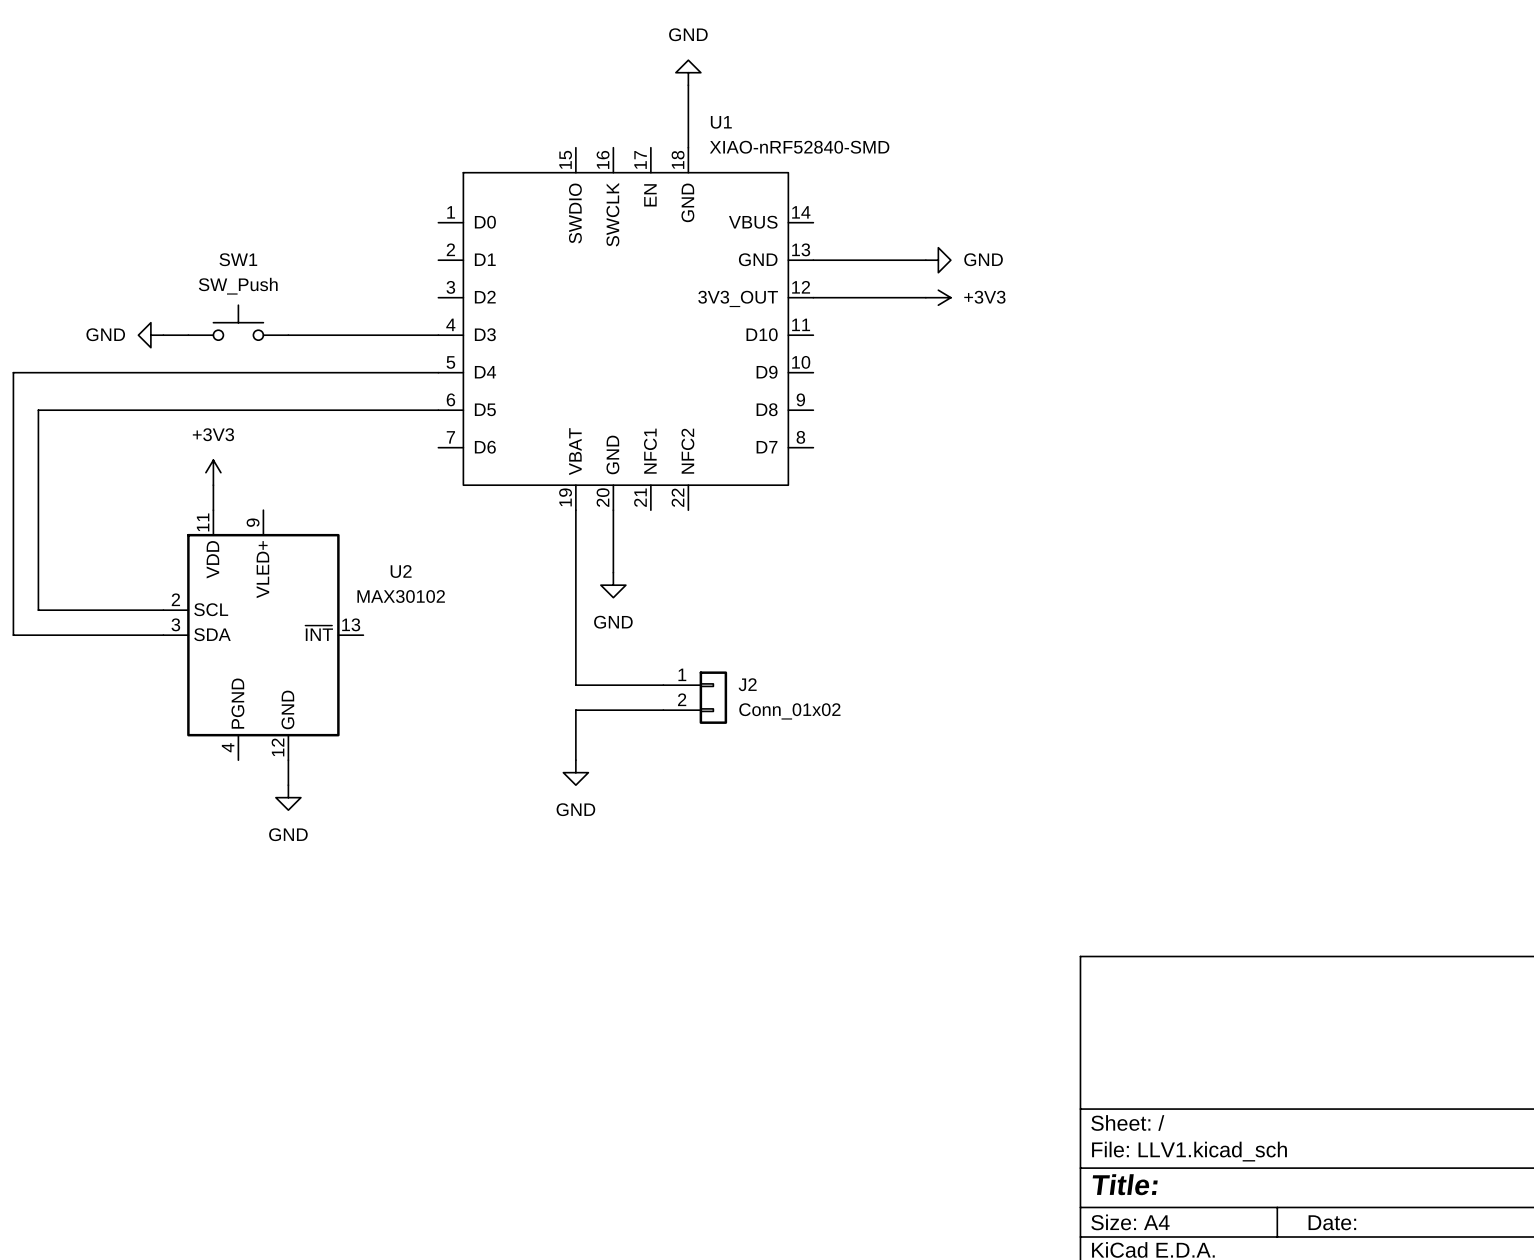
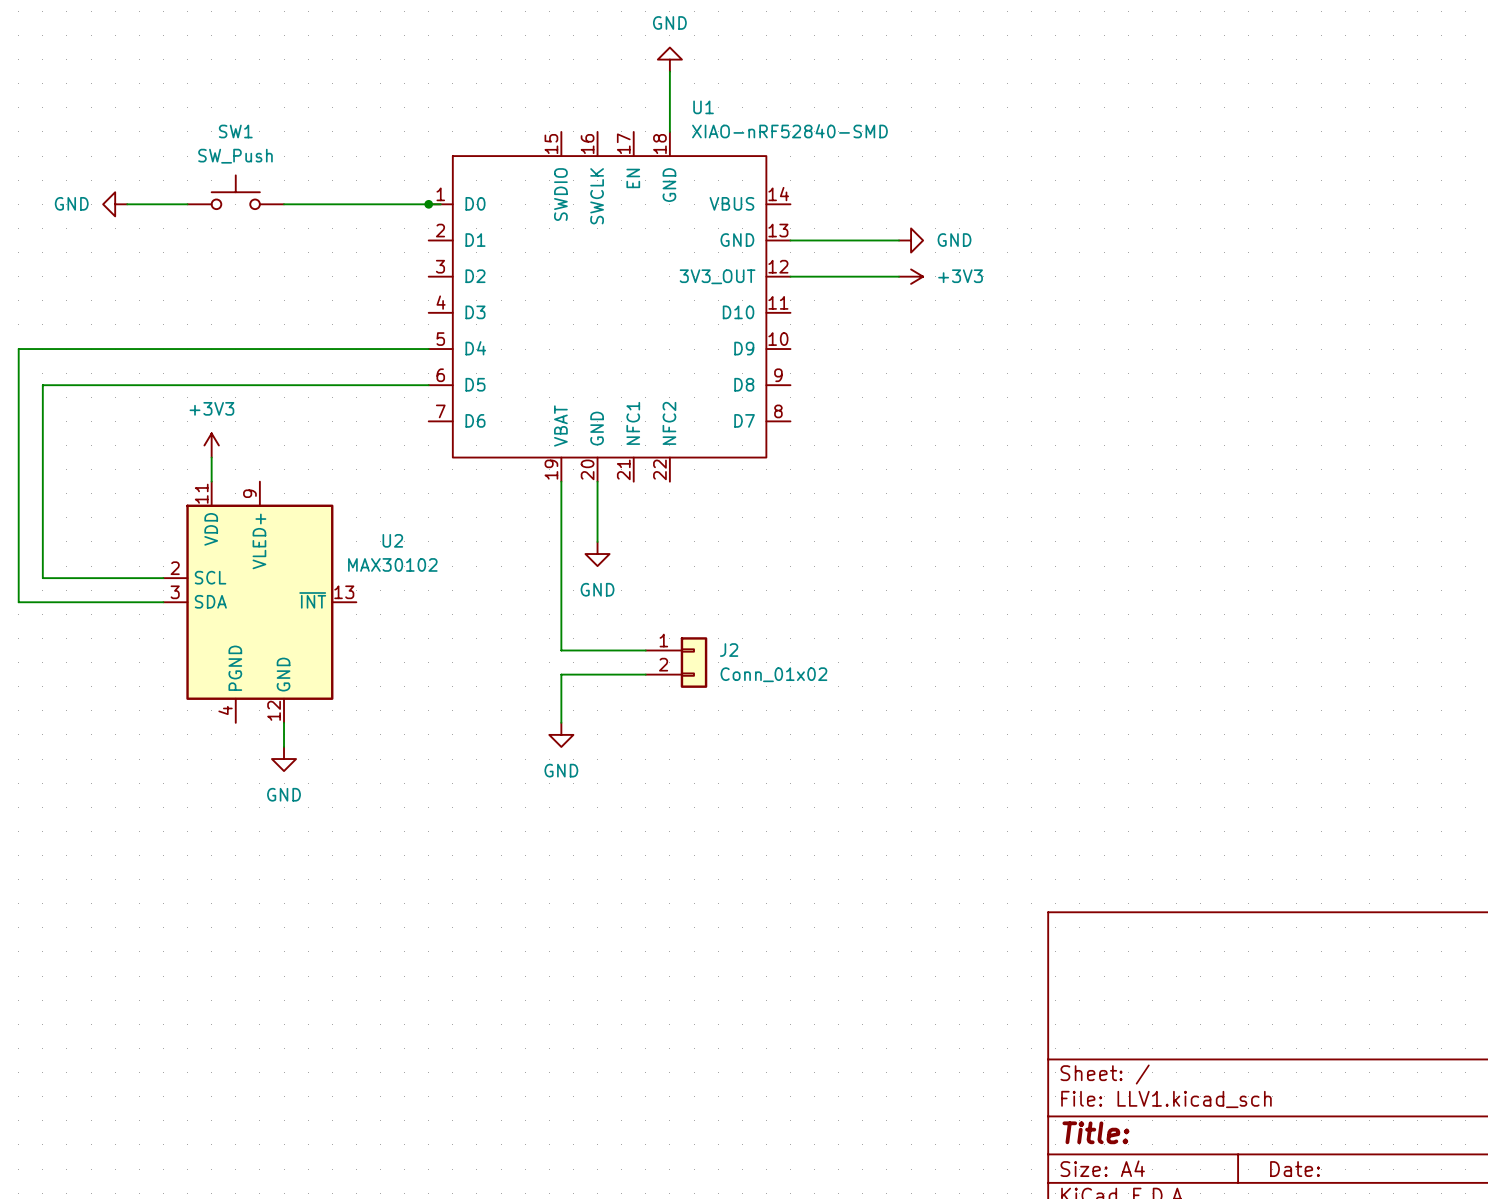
wire: none -> (127, 204) (187, 204)
wire: none -> (284, 204) (440, 204)
junction: none -> (428, 204)
SW1 position: (238, 322) -> (235, 192)
power symbol position: GND (150, 335) -> GND (115, 204)
wire: (163, 335) (188, 335) -> none
wire: (288, 335) (438, 335) -> none

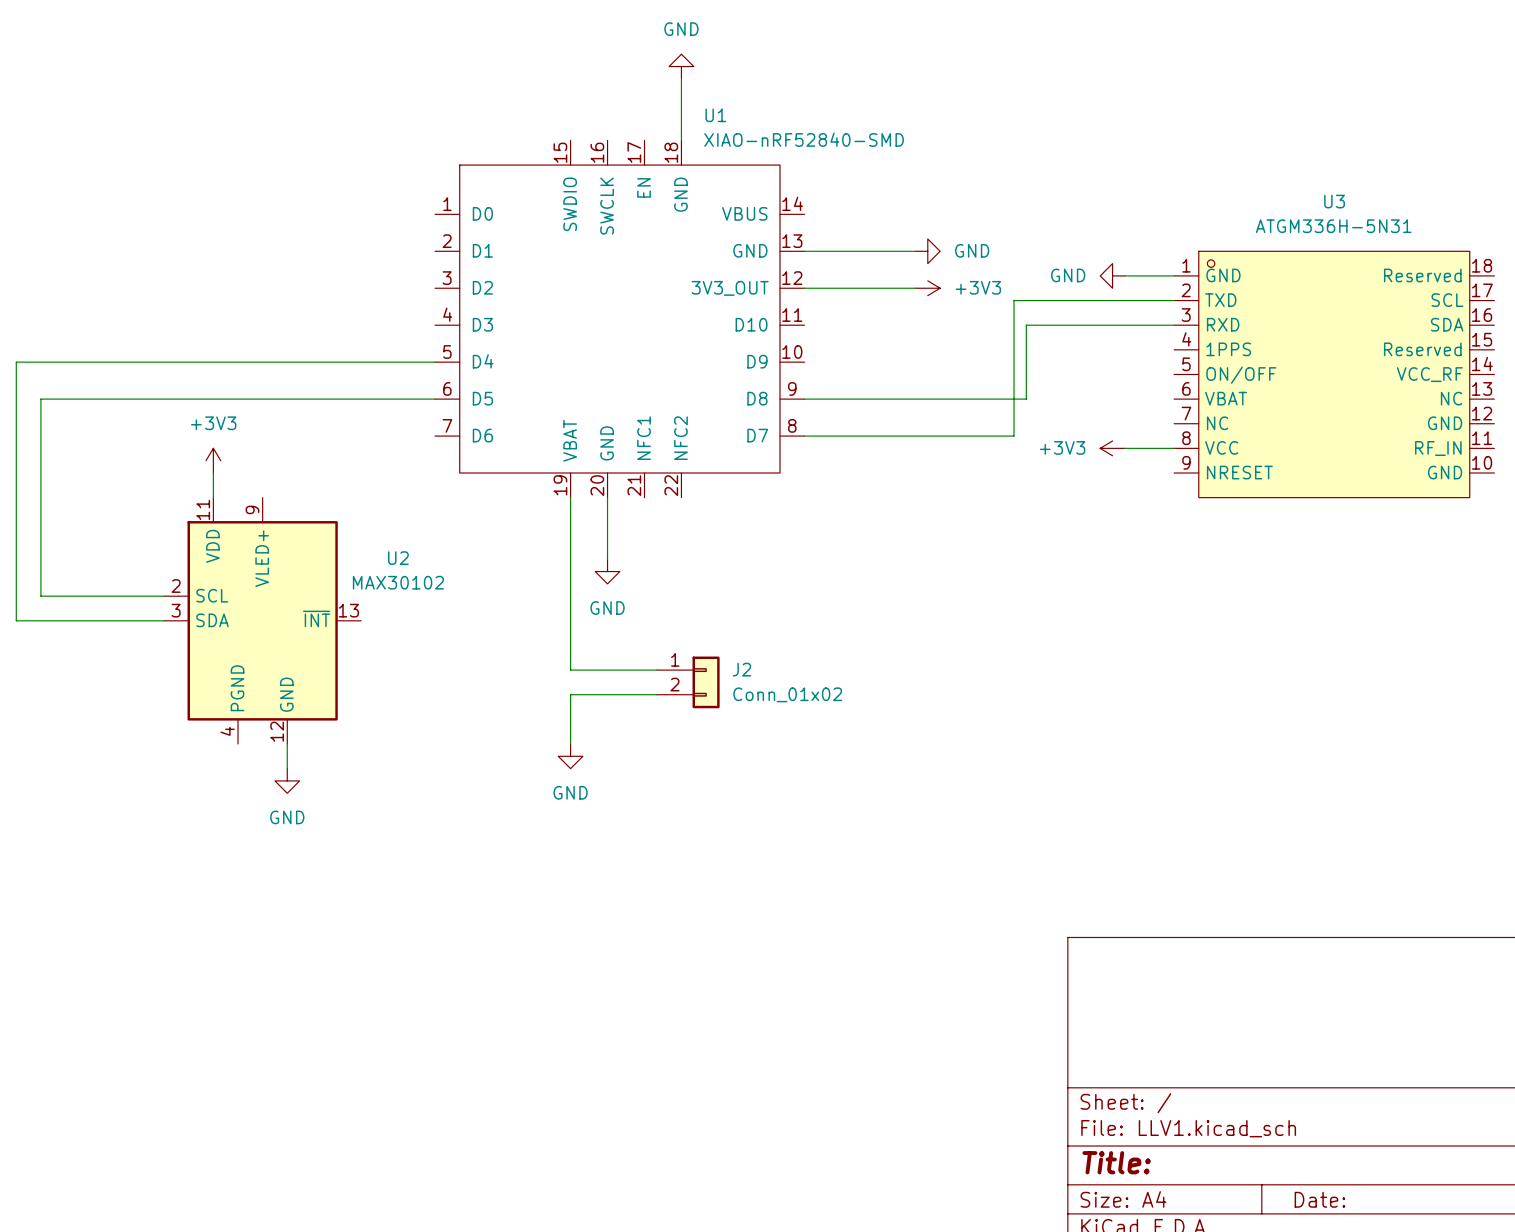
SW1: SW_Push (235, 192) -> none
power symbol: GND (115, 204) -> none
wire: (127, 204) (187, 204) -> none
wire: (284, 204) (440, 204) -> none
junction: (428, 204) -> none
power symbol: none -> GND (1112, 275)
wire: none -> (1124, 275) (1174, 275)
wire: none -> (1174, 300) (1014, 300) (1014, 436) (804, 436)
wire: none -> (1174, 325) (1026, 325) (1026, 399) (804, 399)
U3: none -> ATGM336H-5N31 (1334, 374)
power symbol: none -> +3V3 (1112, 448)
wire: none -> (1124, 448) (1174, 448)

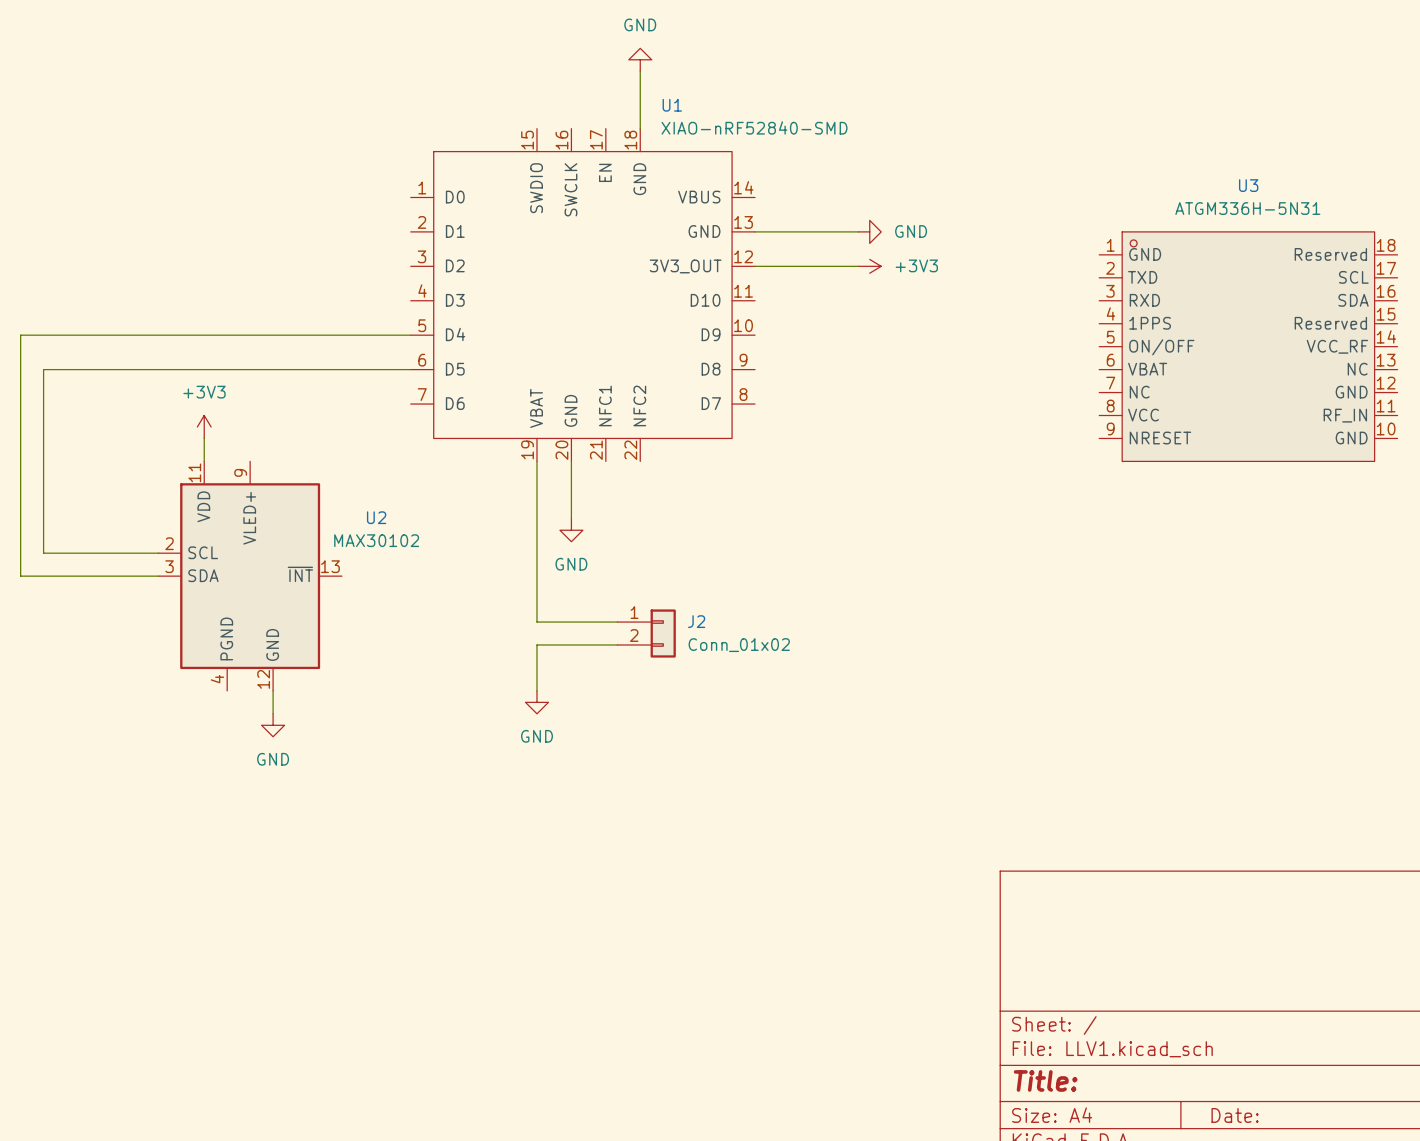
power symbol: GND (1112, 275) -> none
wire: (1124, 275) (1174, 275) -> none
wire: (1174, 300) (1014, 300) (1014, 436) (804, 436) -> none
wire: (1174, 325) (1026, 325) (1026, 399) (804, 399) -> none
power symbol: +3V3 (1112, 448) -> none
wire: (1124, 448) (1174, 448) -> none

